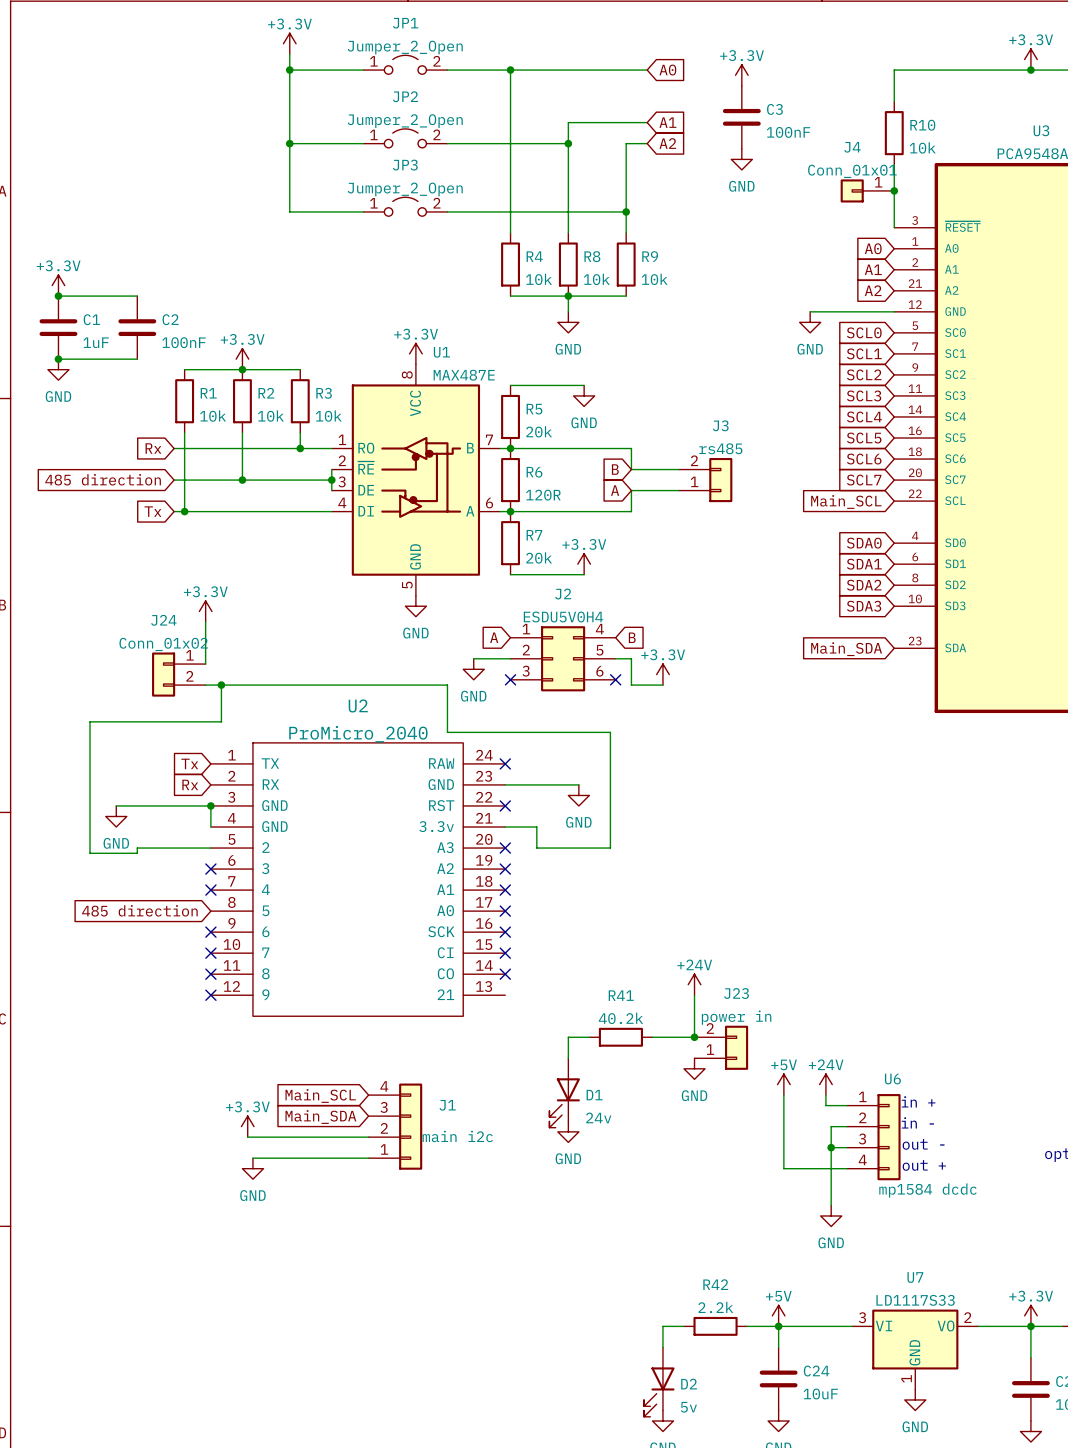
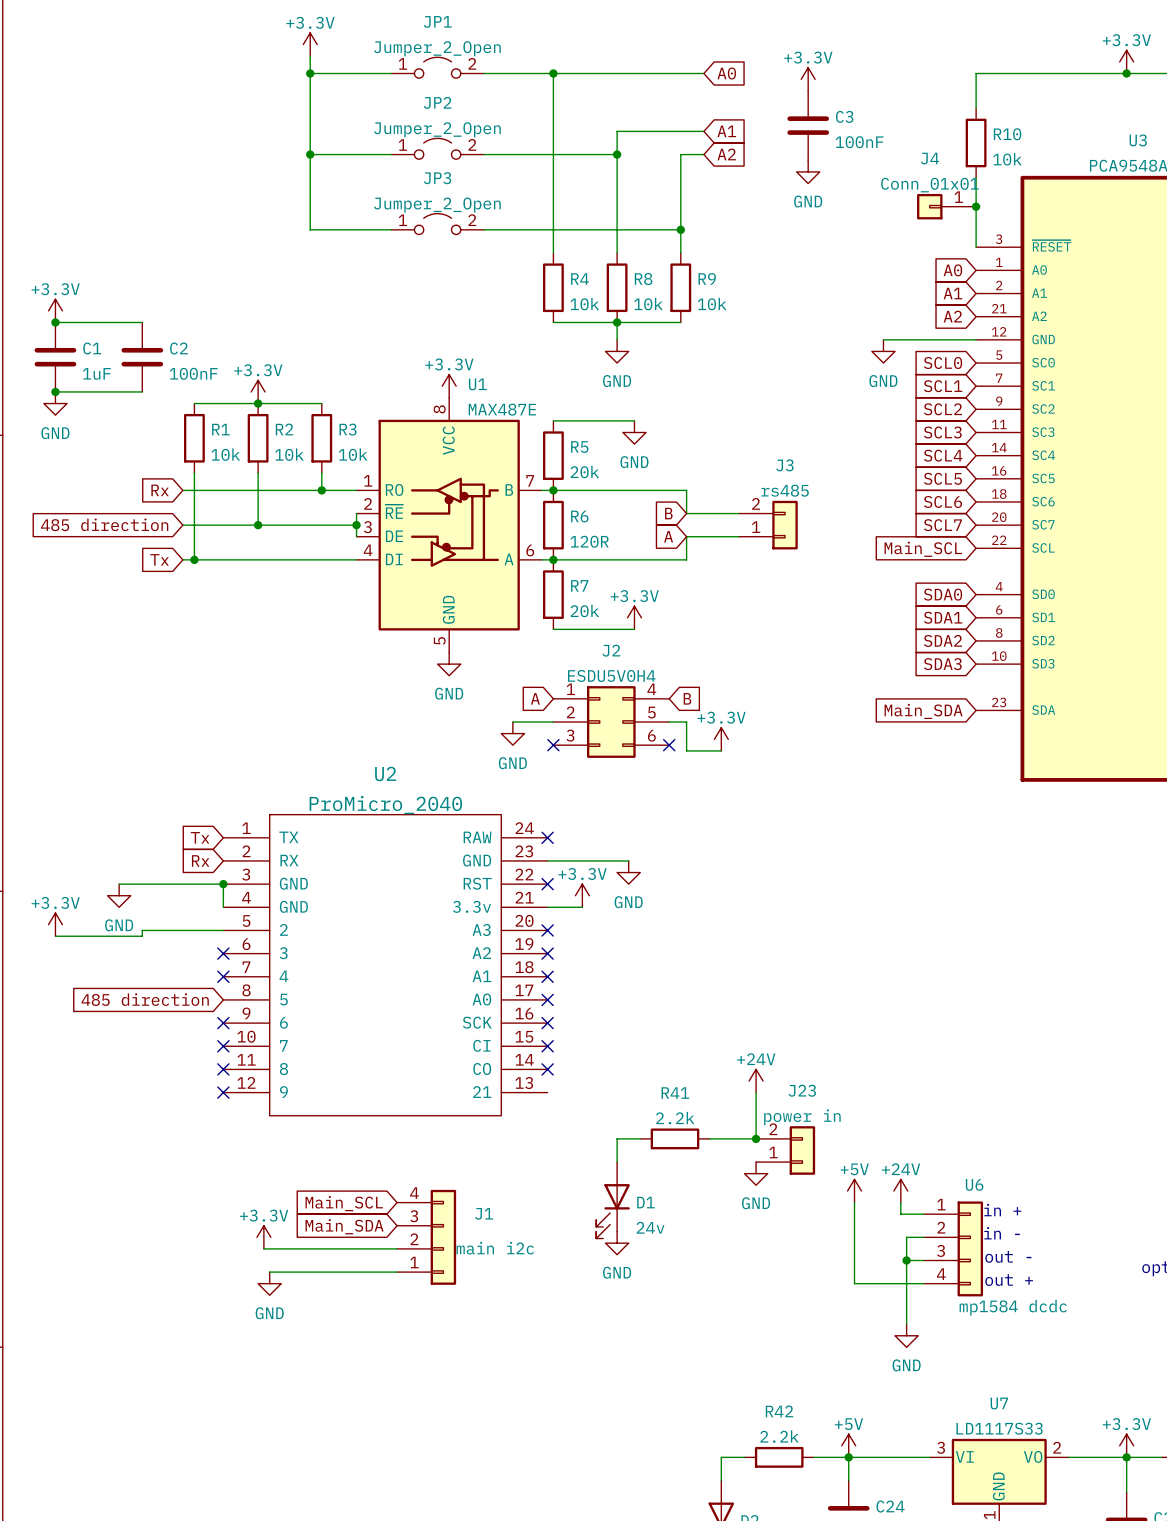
power symbol: +3.3V (205, 611) -> none
wire: (205, 621) (205, 664) -> none
J24: Conn_01x02 (178, 674) -> none
wire: (205, 685) (447, 685) (447, 732) (610, 732) (610, 848) (536, 848) (536, 827) -> none
wire: (221, 685) (221, 721) (90, 721) (90, 853) -> (55, 936) (90, 936)
junction: (221, 685) -> none
power symbol: none -> +3.3V (582, 895)
power symbol: none -> +3.3V (55, 924)
R41 value: 40.2k (620, 1018) -> 2.2k (675, 1118)

